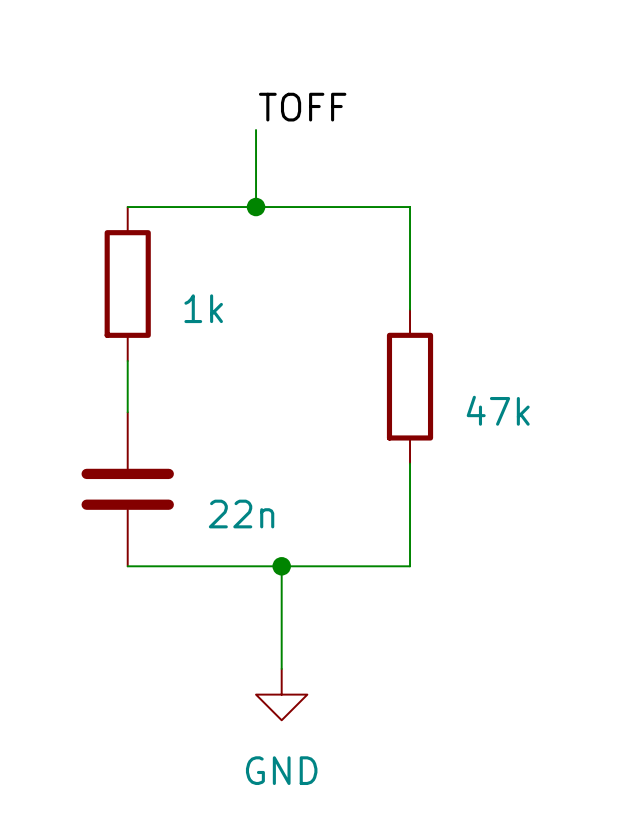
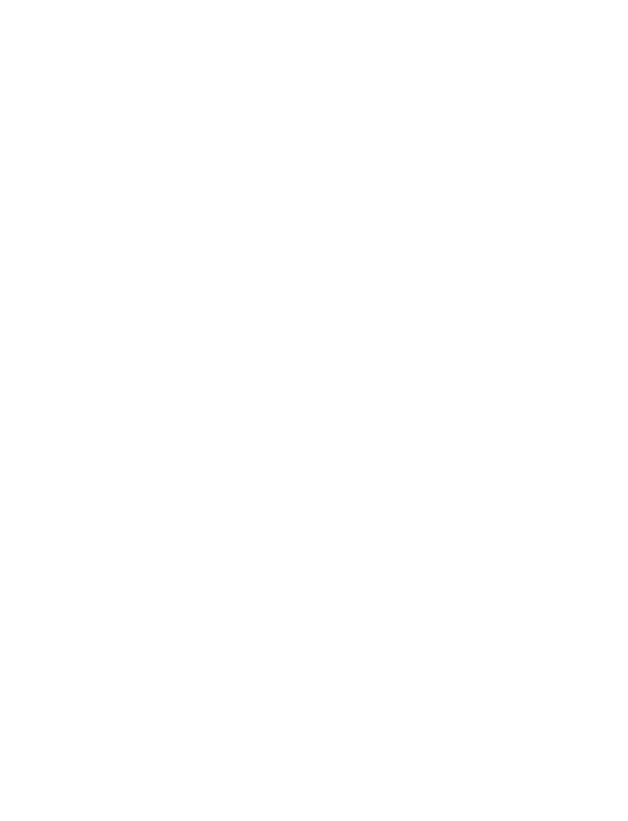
label: TOFF (302, 107) -> none
wire: (256, 130) (256, 207) -> none
wire: (127, 207) (410, 207) (410, 309) -> none
junction: (256, 207) -> none
part: 1k (127, 284) -> none
wire: (127, 360) (127, 412) -> none
part: 47k (410, 386) -> none
wire: (410, 463) (410, 566) (127, 566) -> none
part: 22n (127, 489) -> none
wire: (281, 566) (281, 668) -> none
junction: (281, 566) -> none
power symbol: GND (281, 694) -> none

